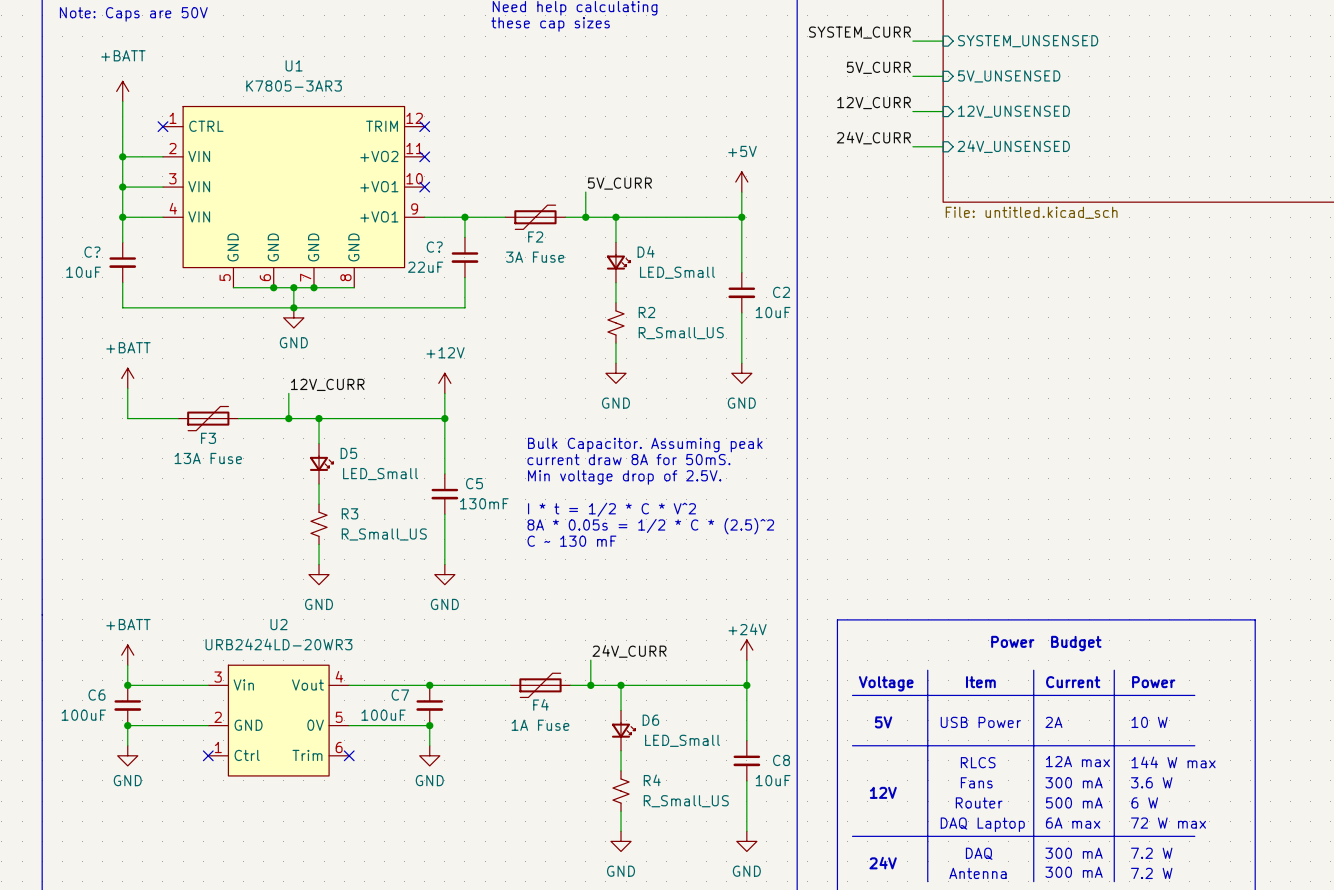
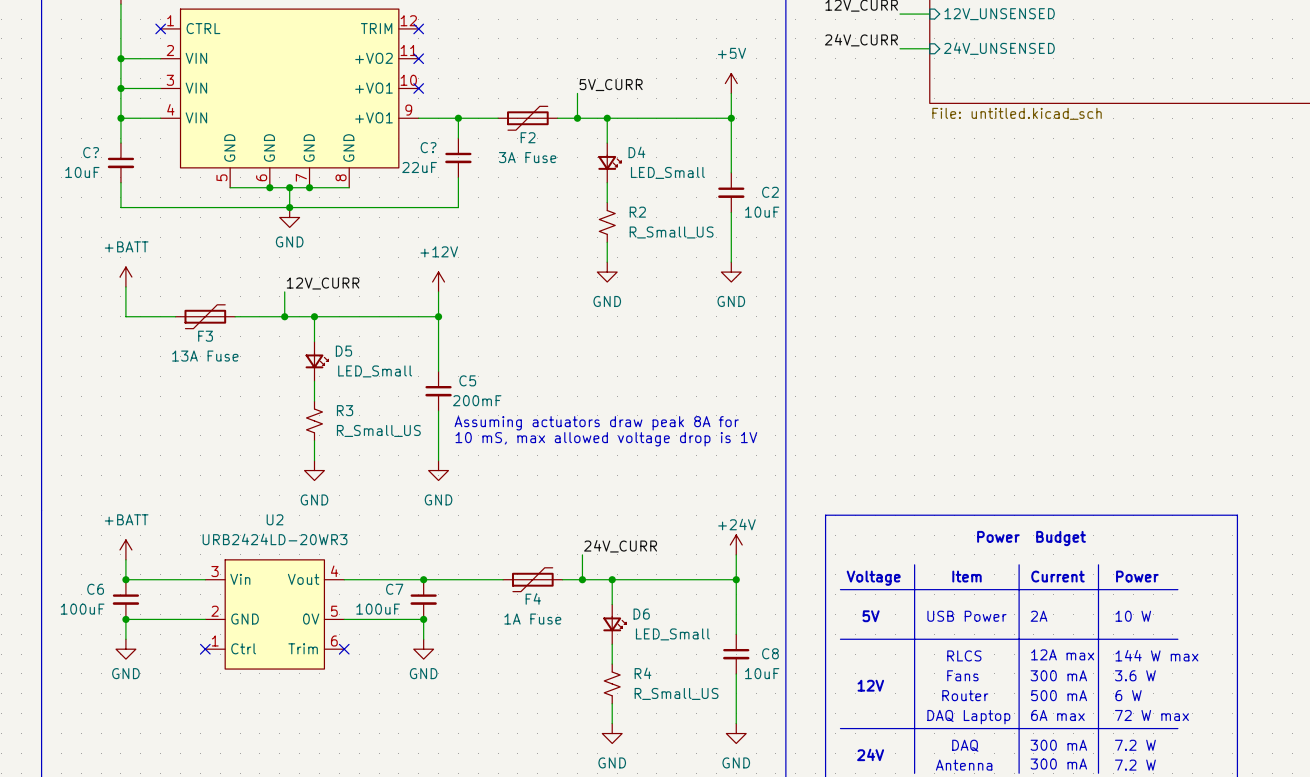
text: Bulk Capacitor. Assuming peak (645, 445) -> none
text: current draw 8A for 50mS. (628, 459) -> none
text: Min voltage drop of 2.5V. (624, 477) -> none
C5 value: 130mF (484, 503) -> 200mF (477, 400)
text: I * t = 1/2 * C * V^2 (611, 509) -> none
text: none -> Assuming actuators draw peak 8A for (596, 423)
text: 8A * 0.05s = 1/2 * C * (2.5)^2 (650, 526) -> none
text: C ~ 130 mF (571, 541) -> none
text: none -> 10 mS, max allowed voltage drop is 1V (606, 439)

